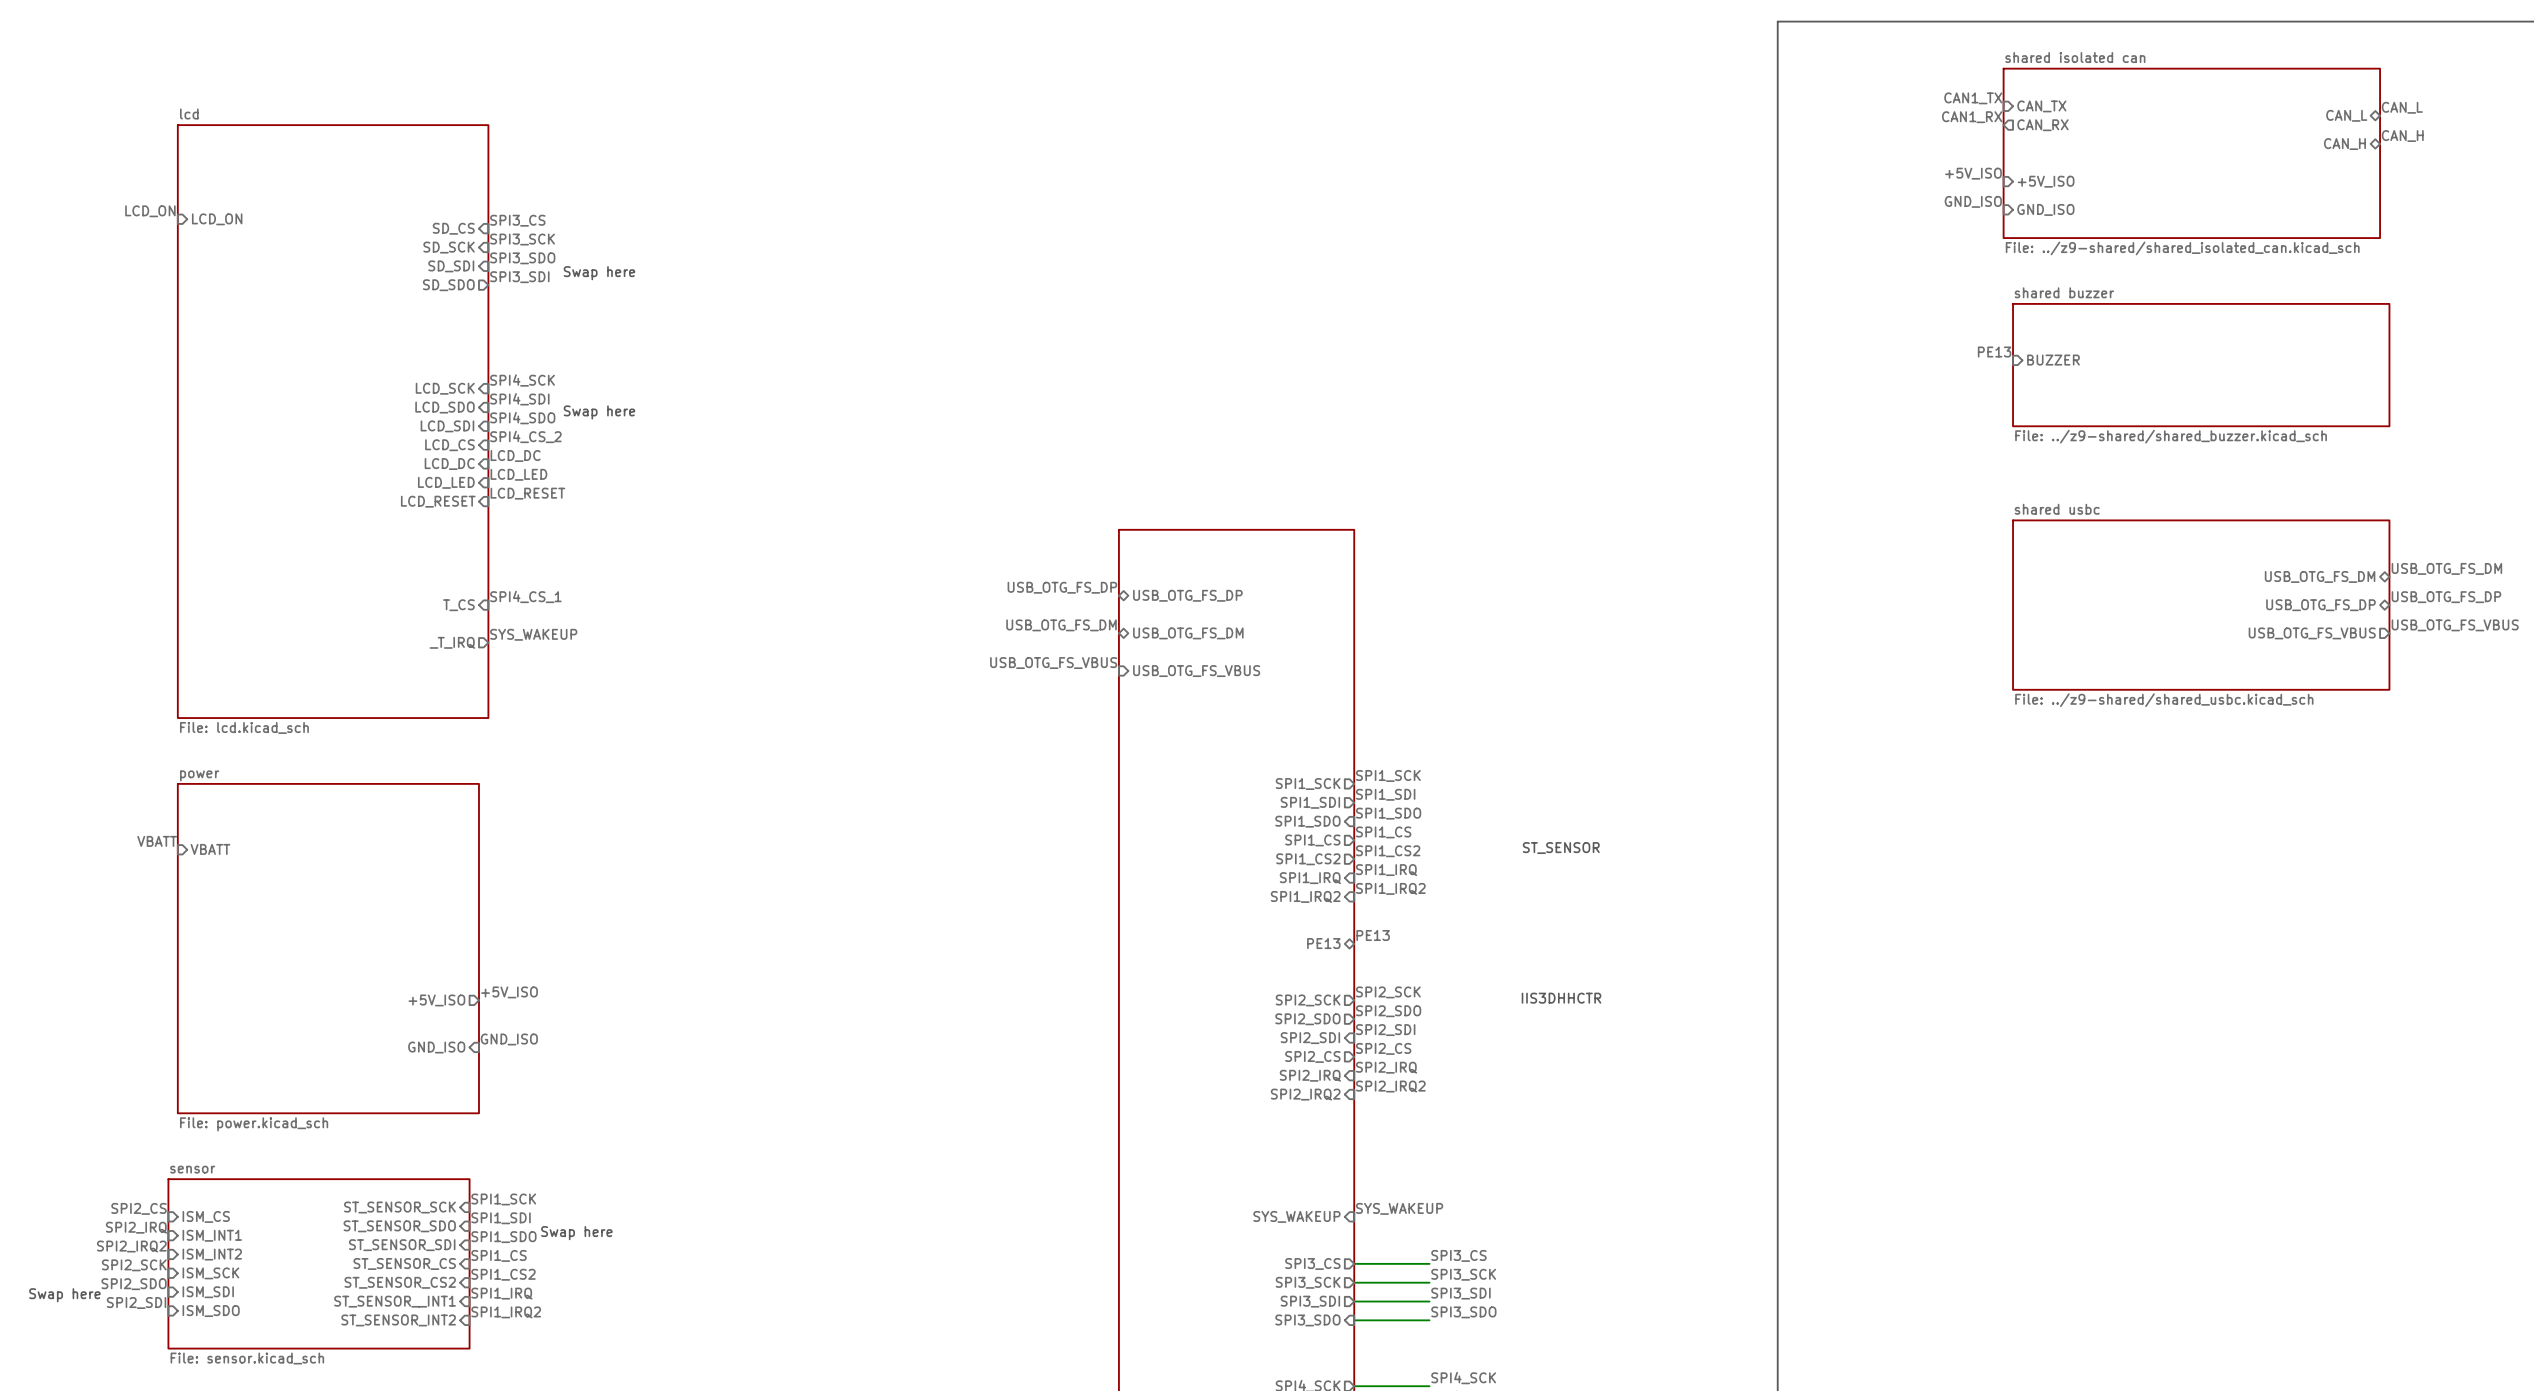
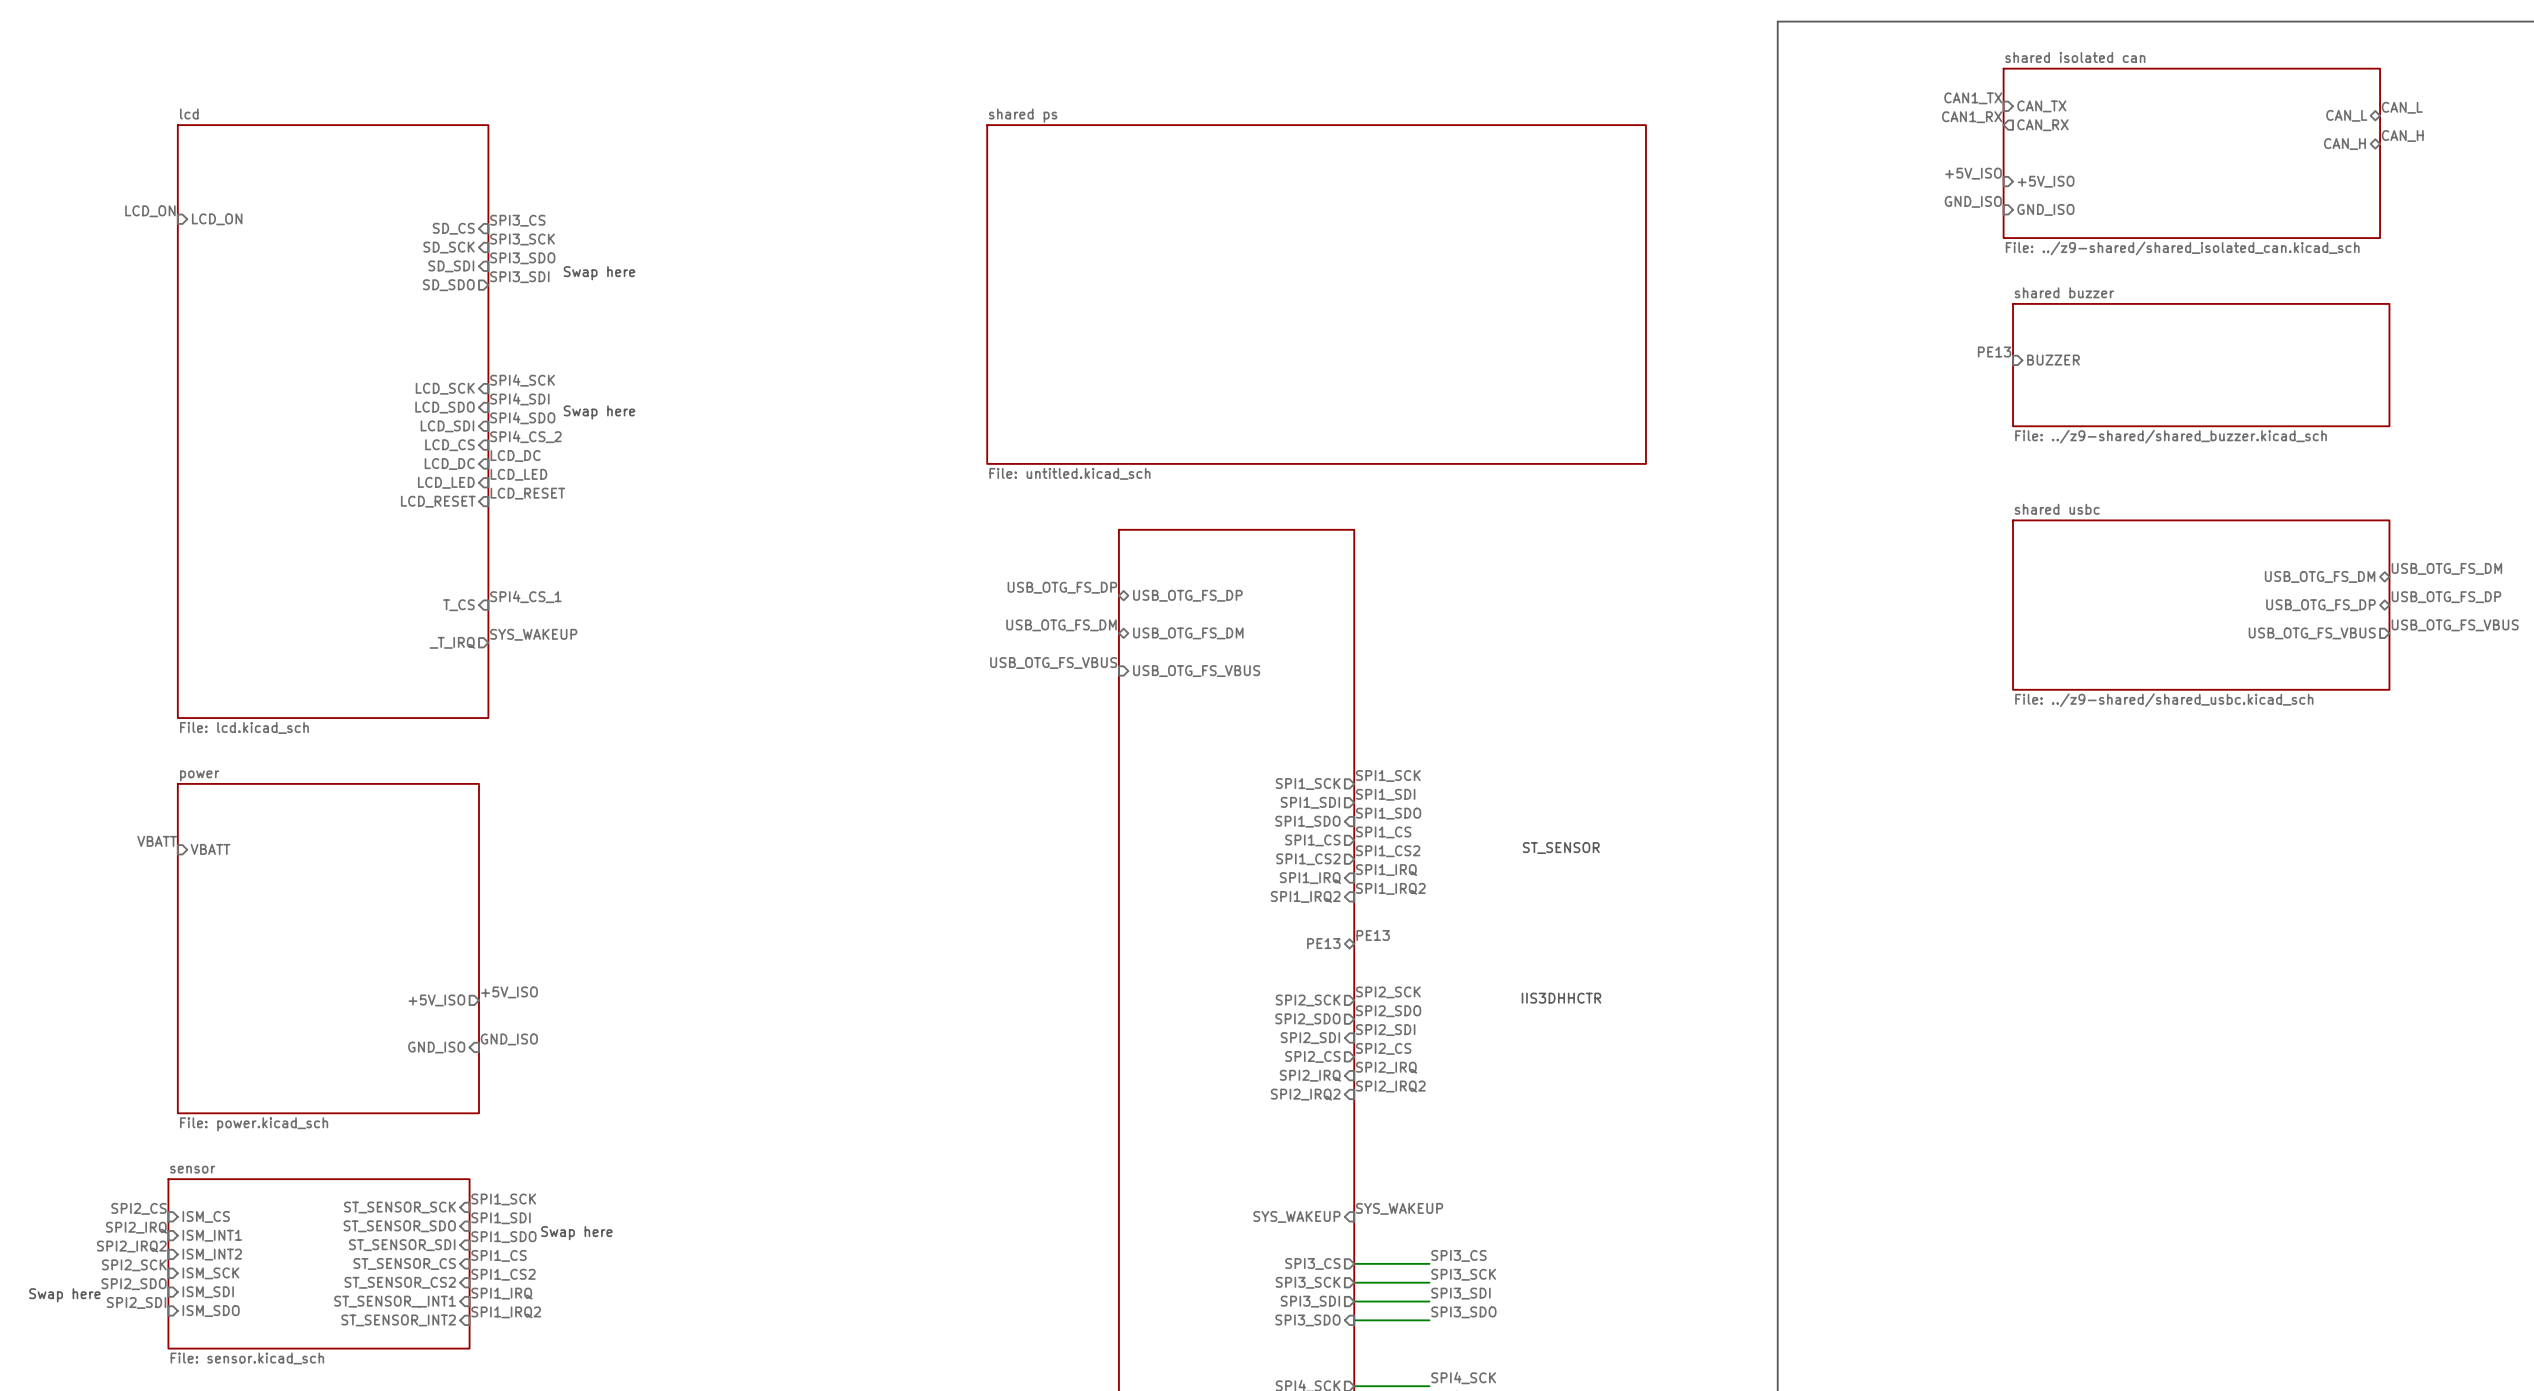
sheet shared ps: none -> File: untitled.kicad_sch (1316, 294)

